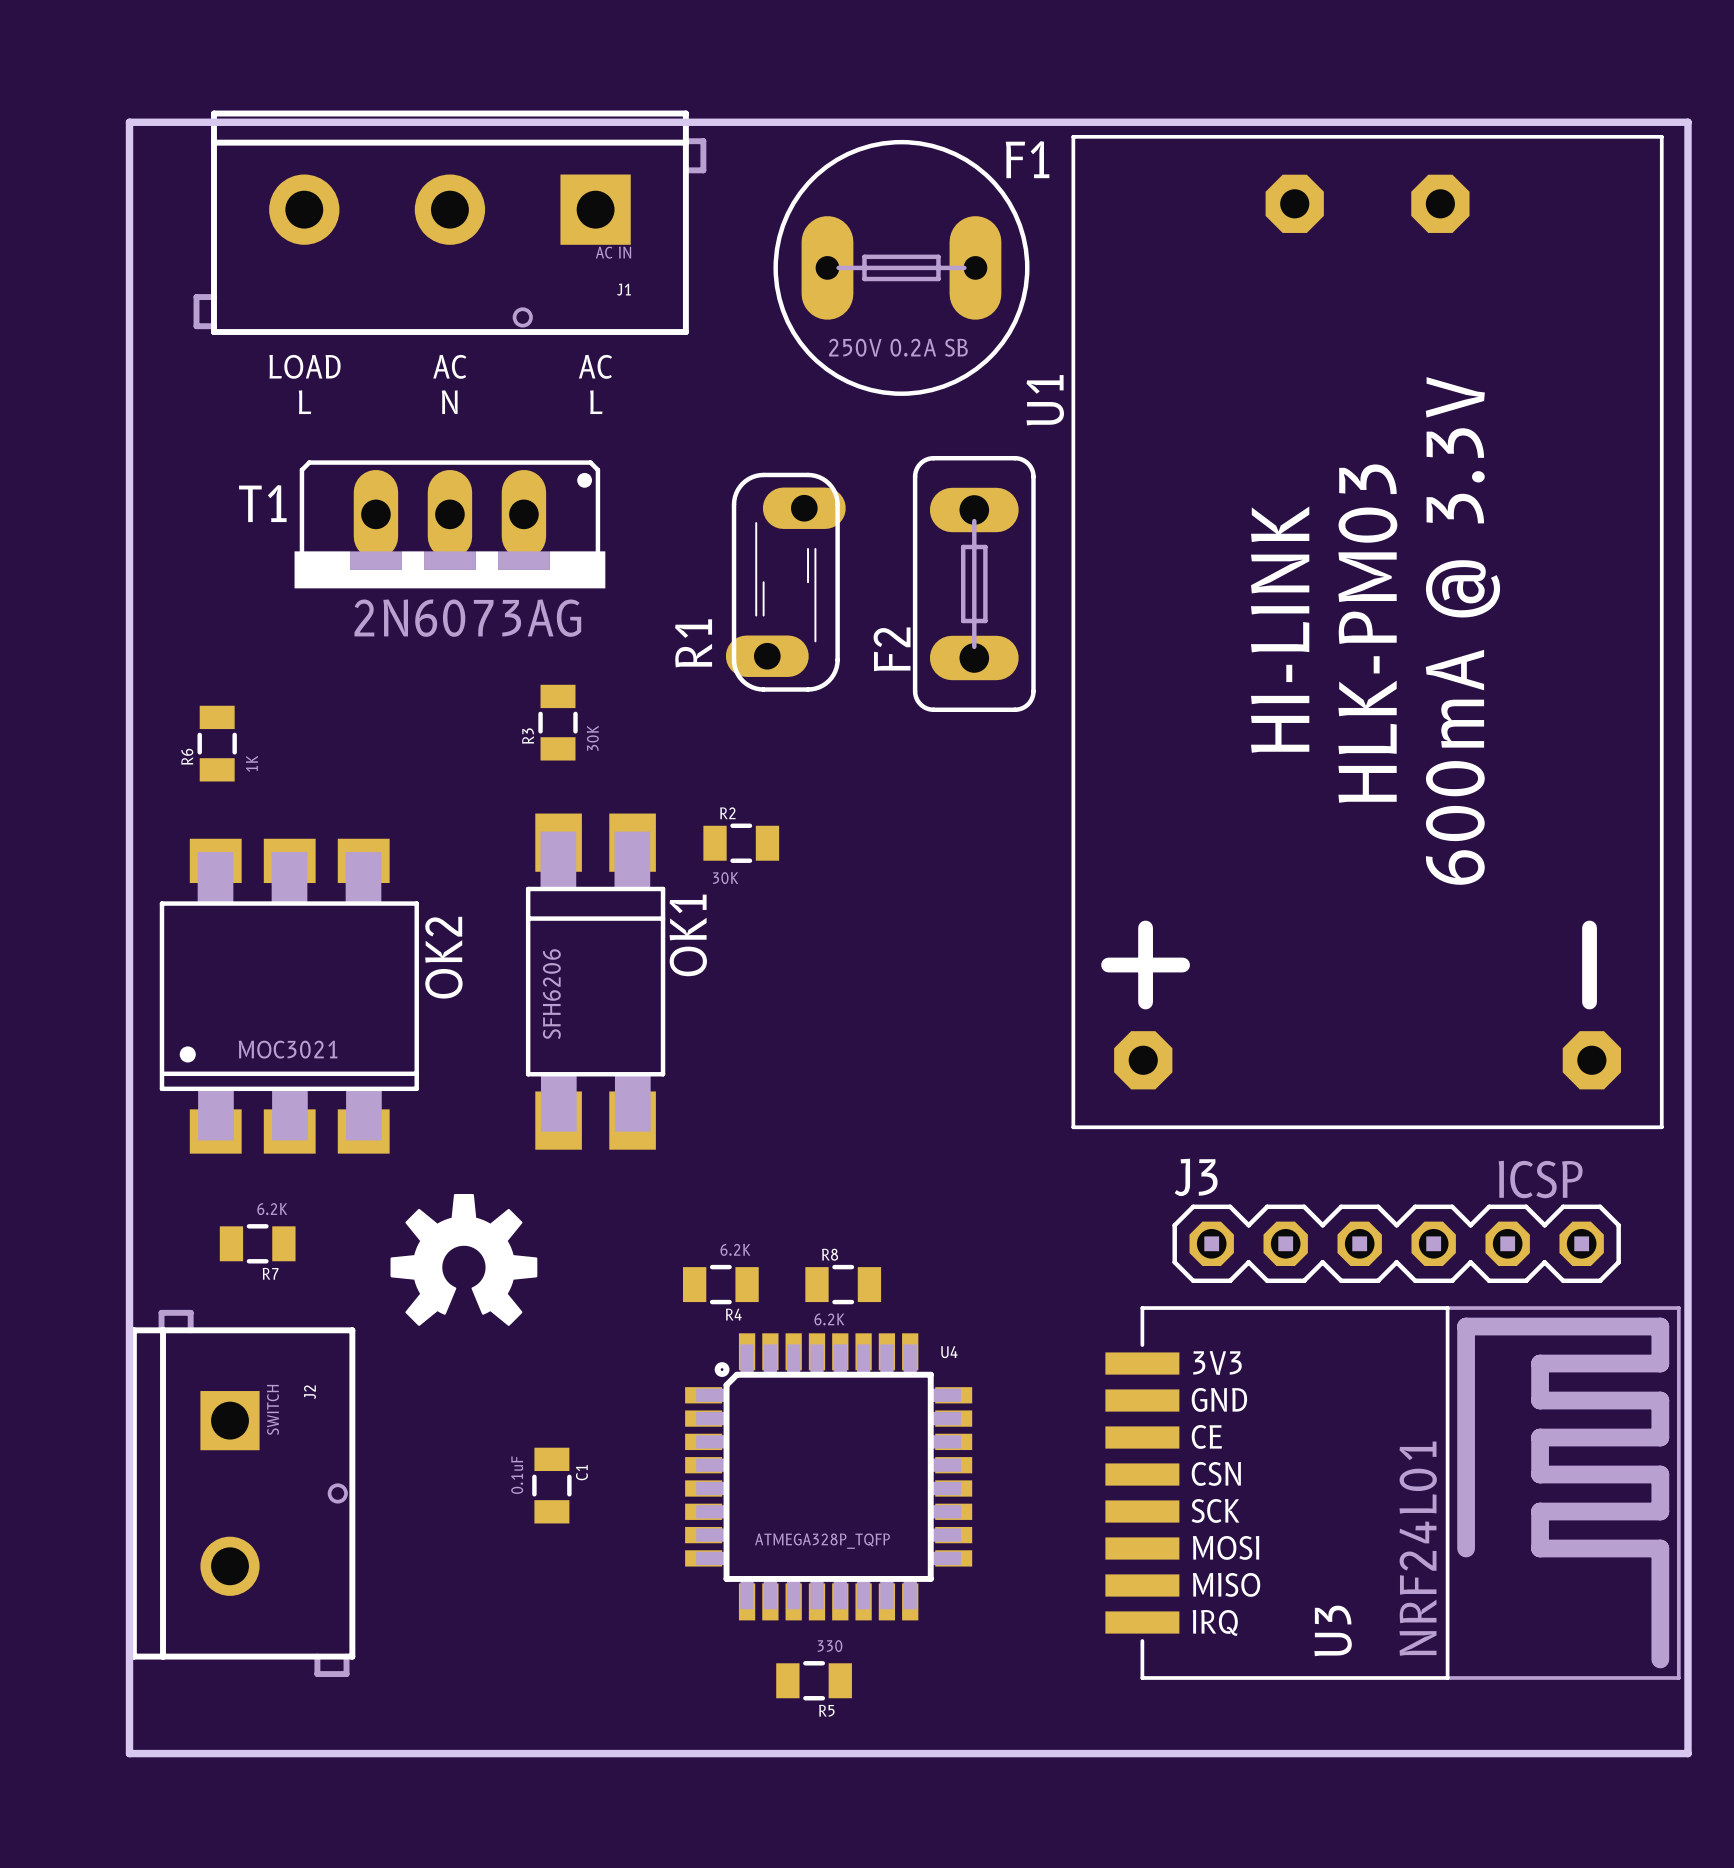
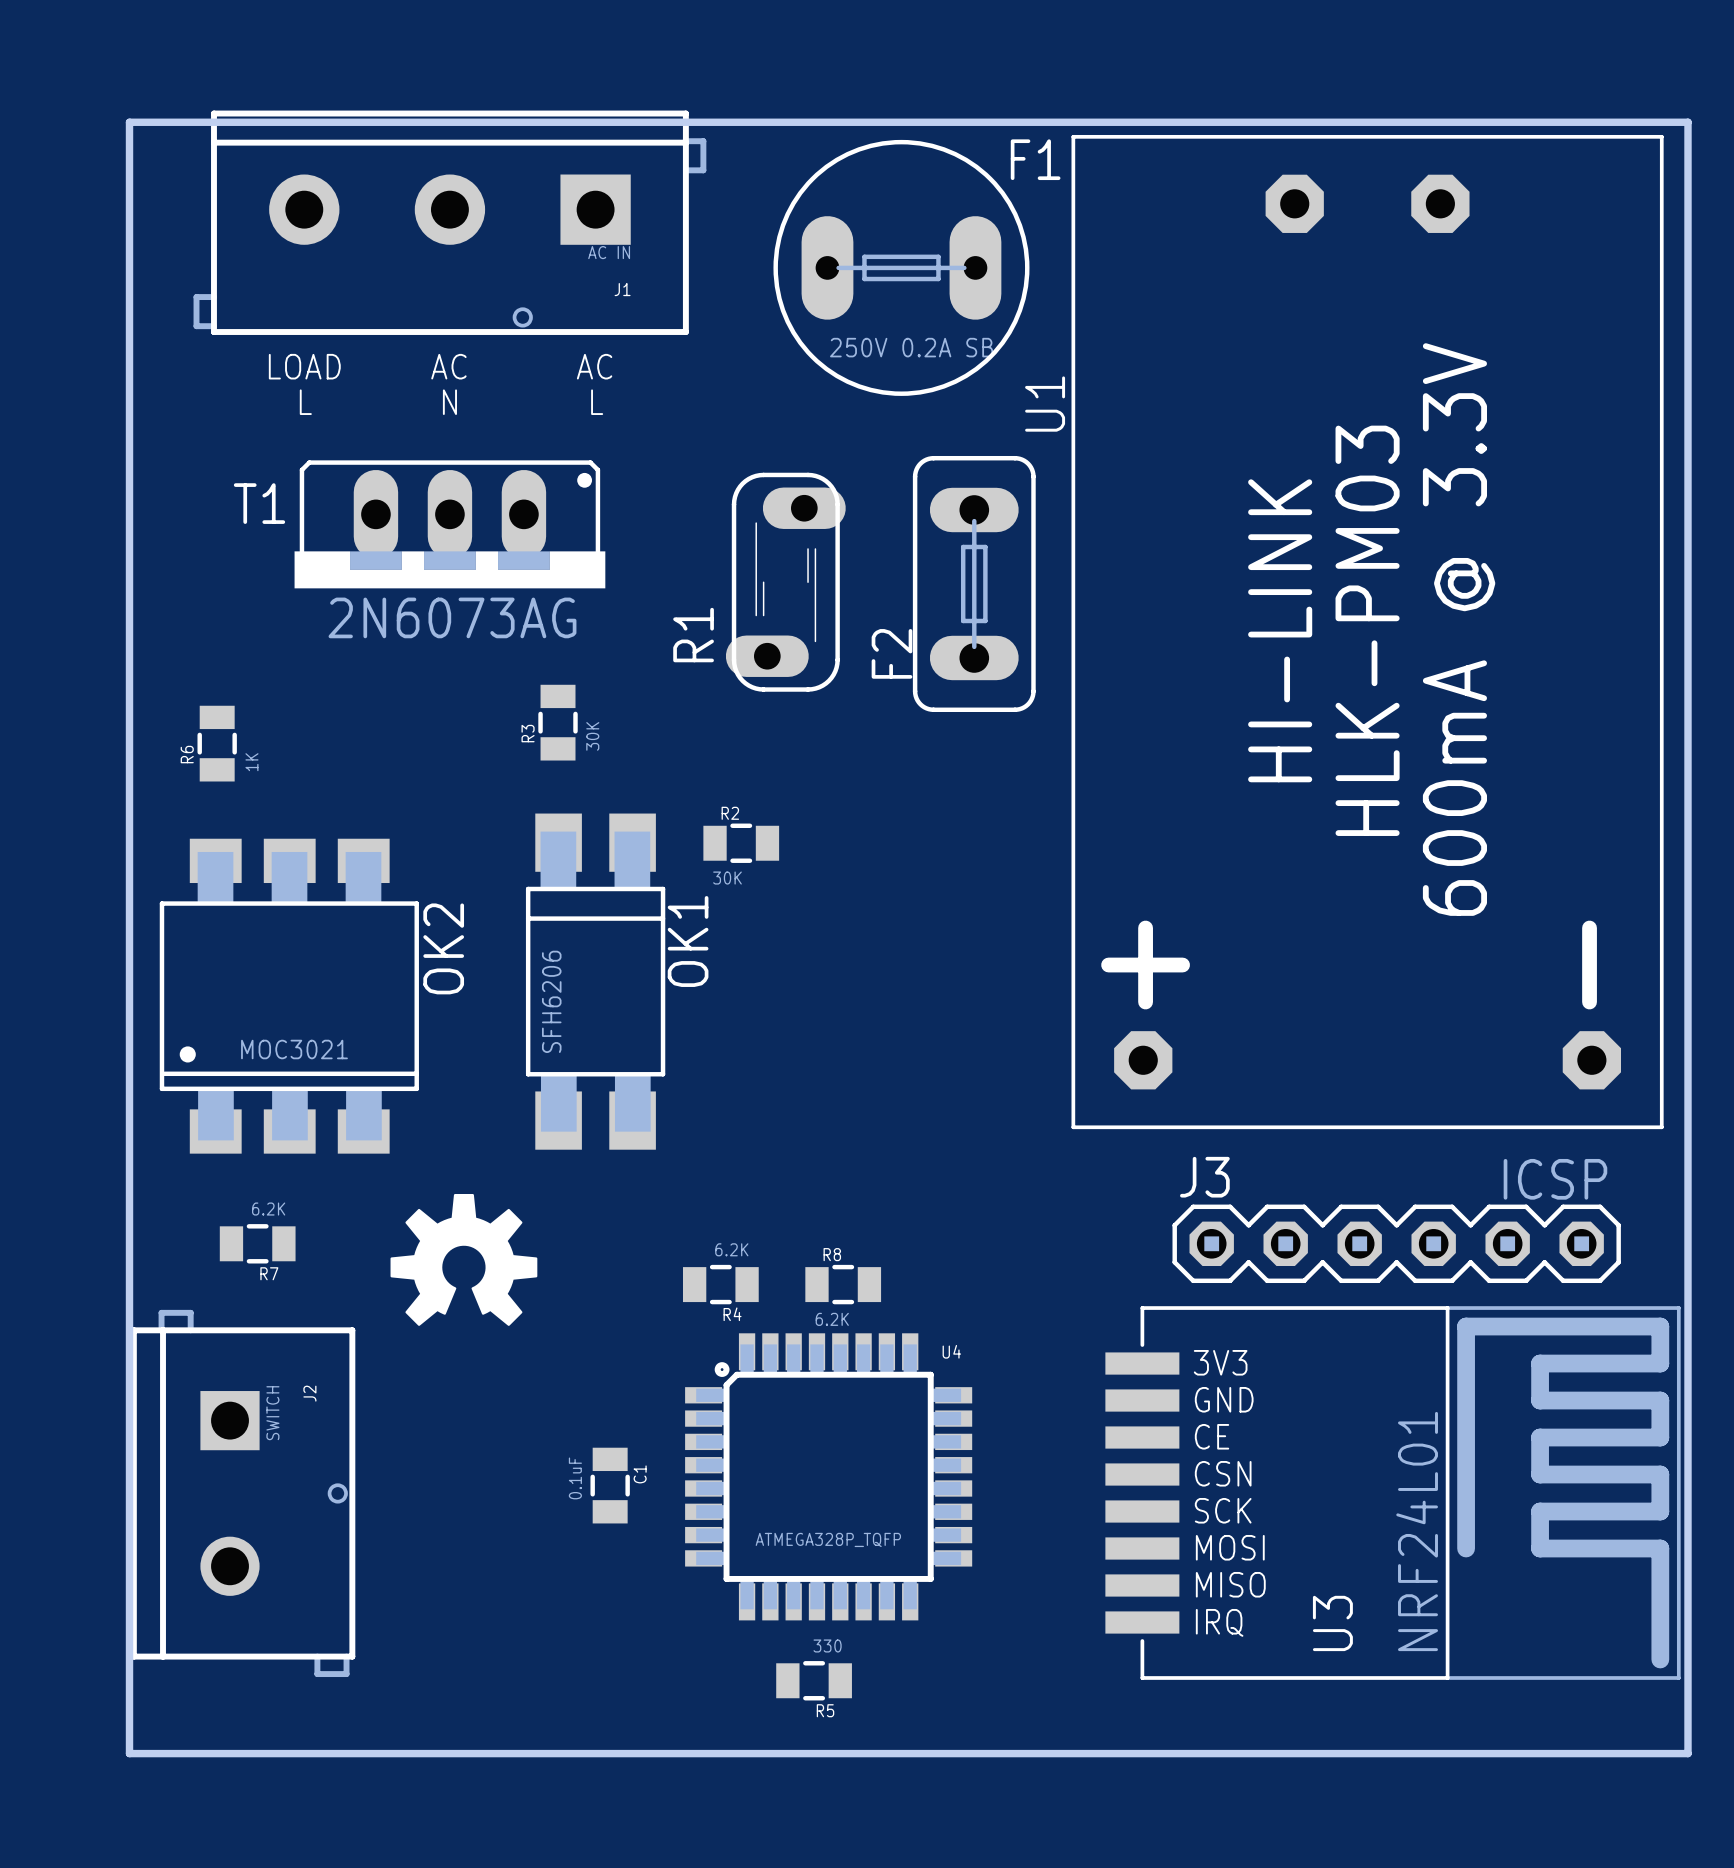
C1 position: (551, 1485) -> (610, 1485)

